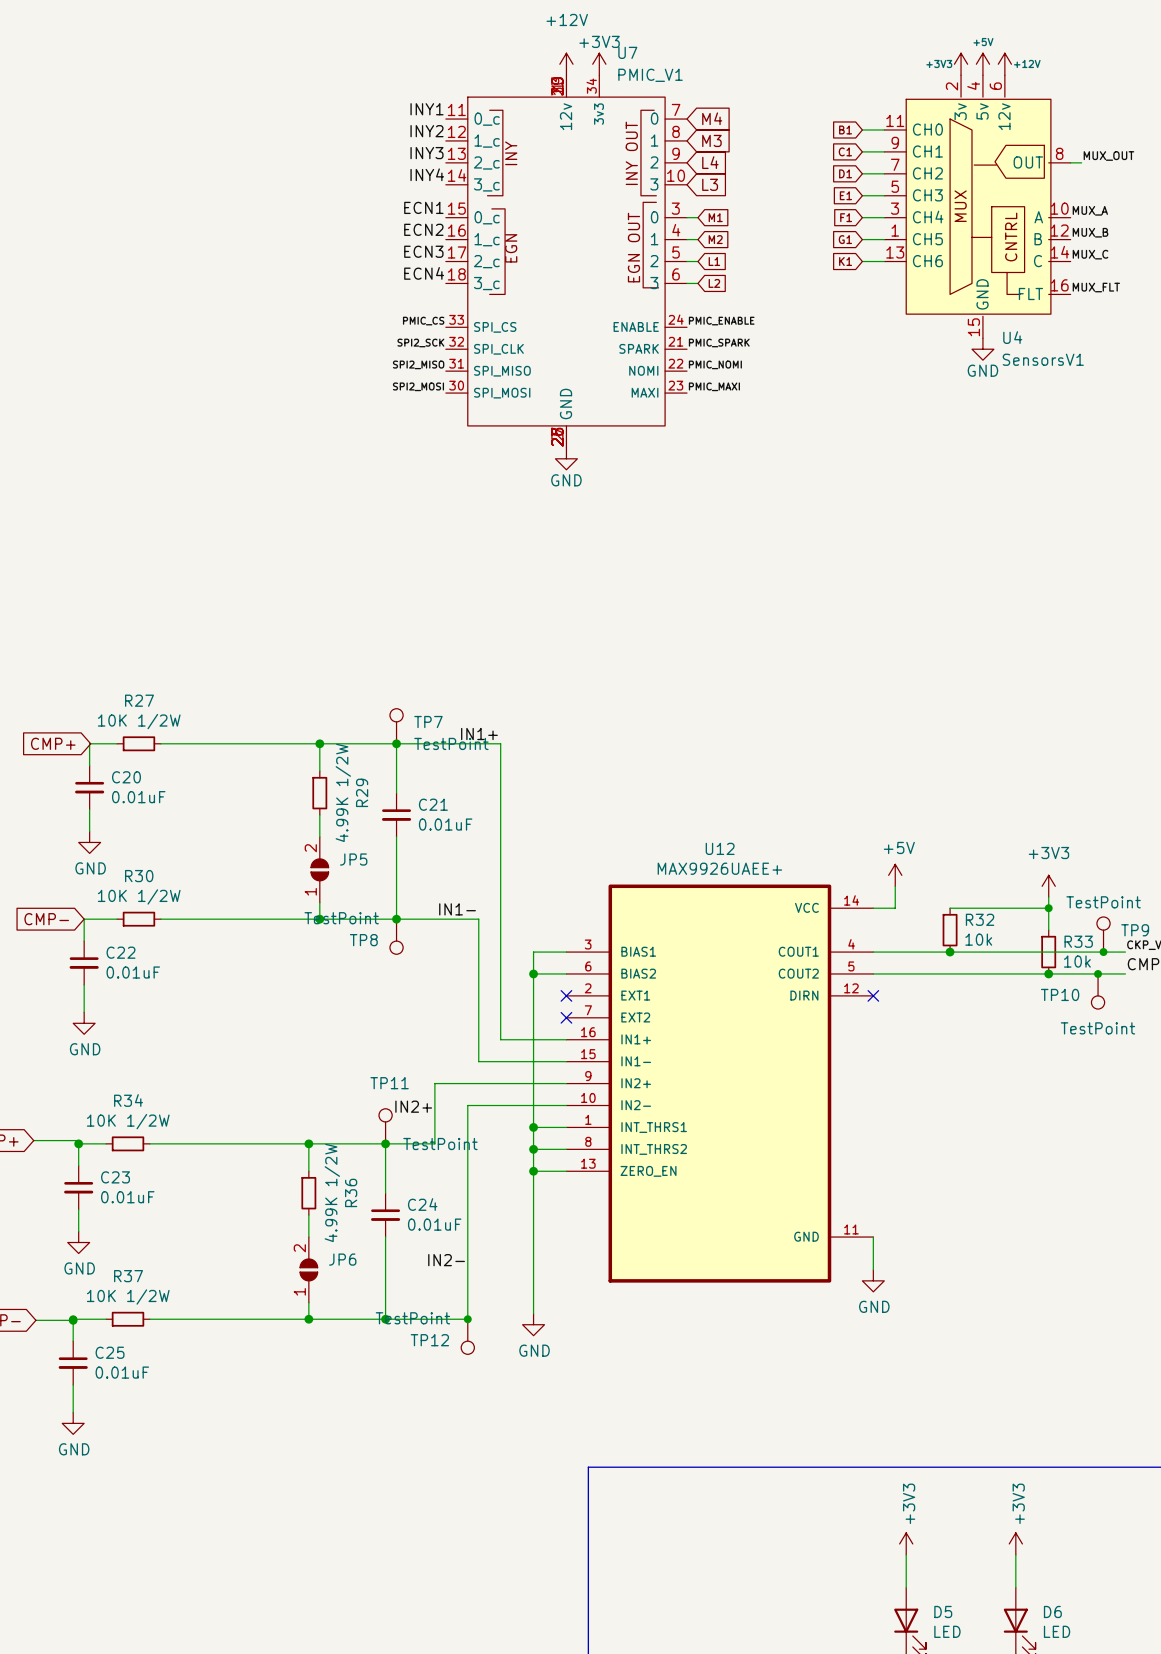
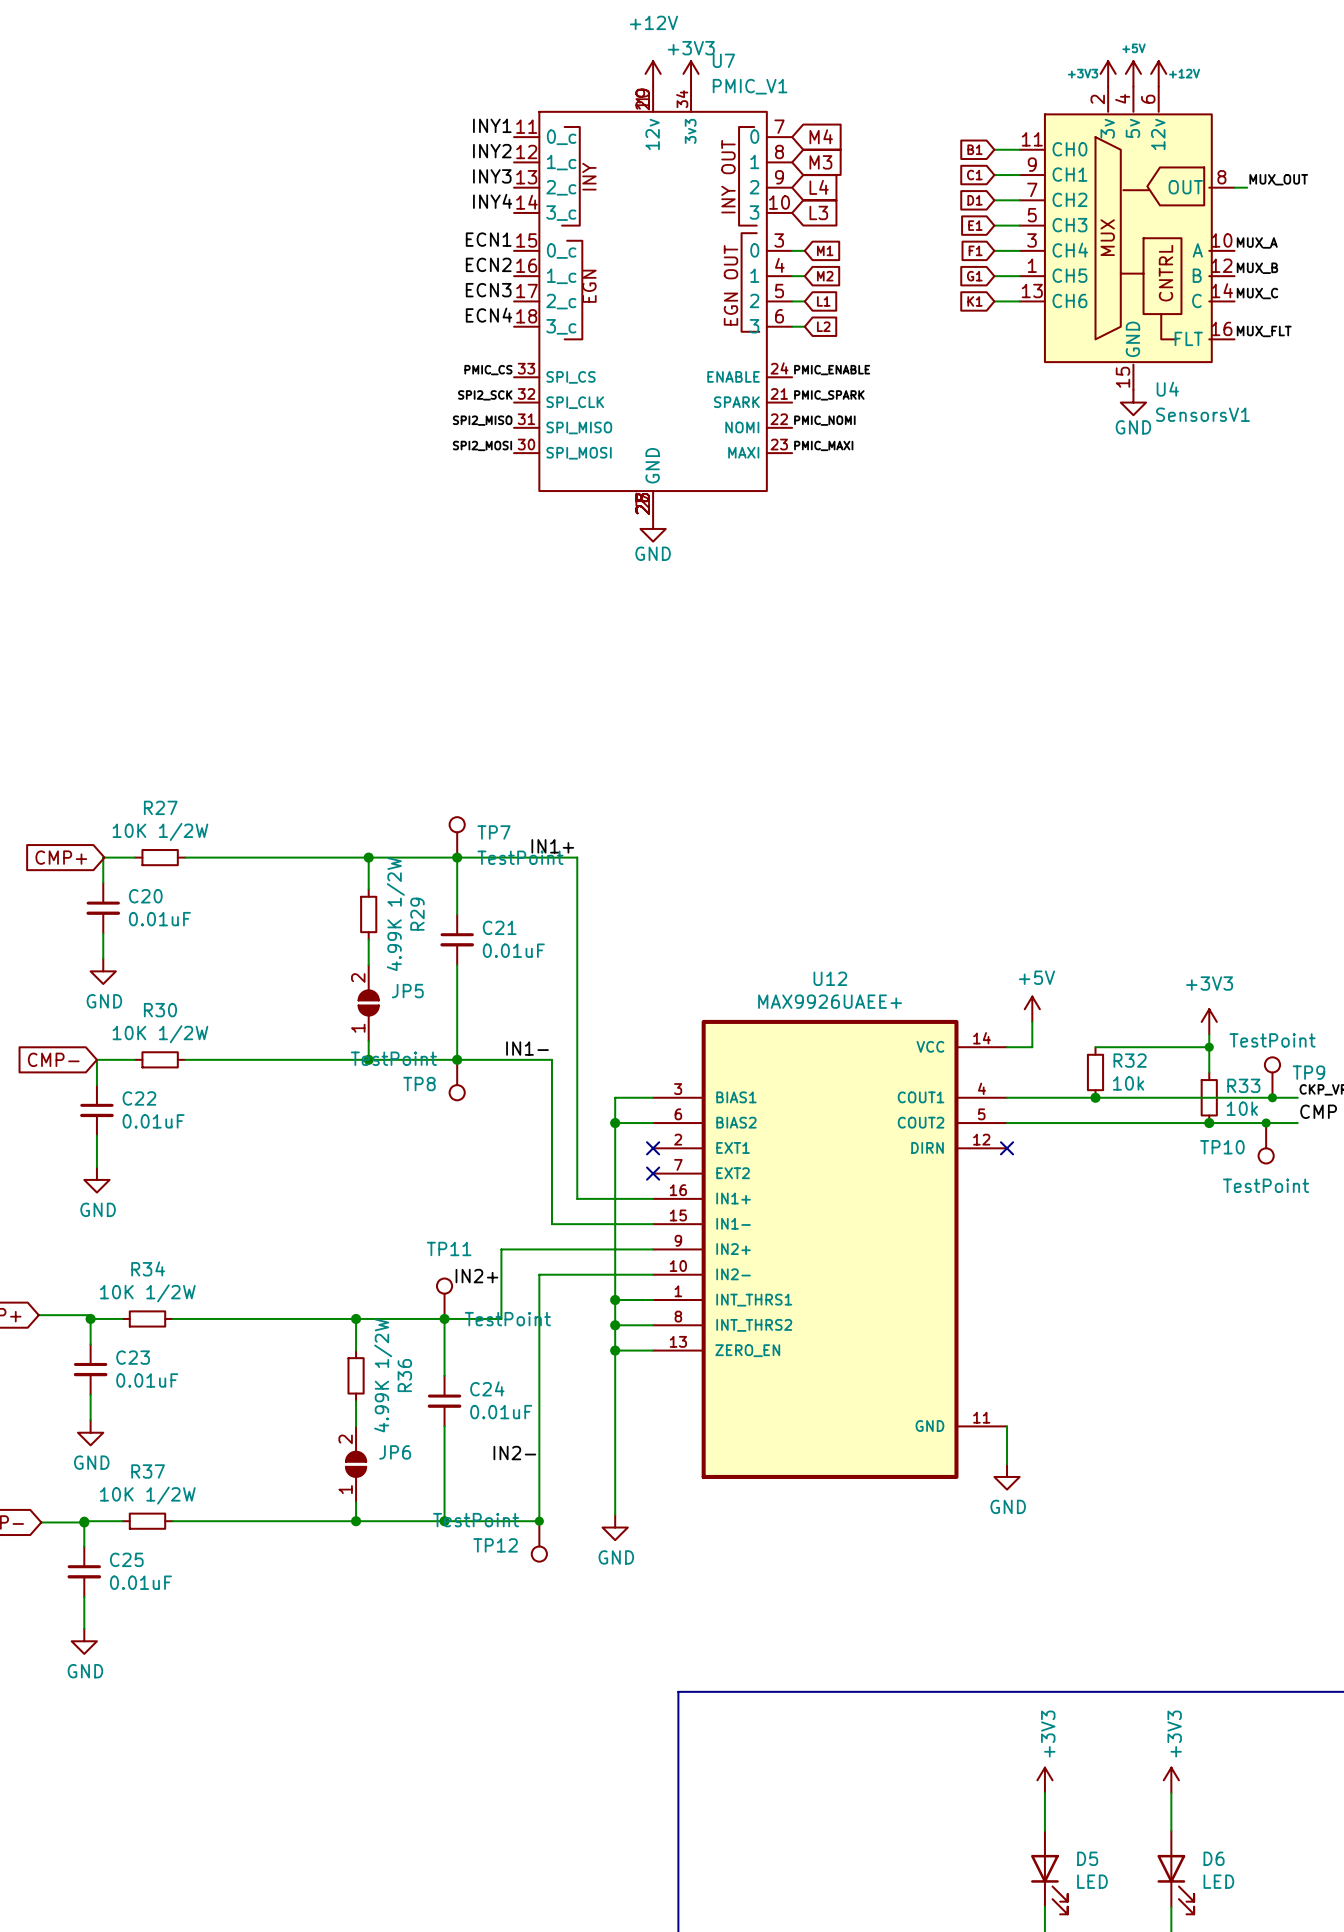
U7 symbol: [445, 75, 688, 448] -> [514, 86, 793, 517]

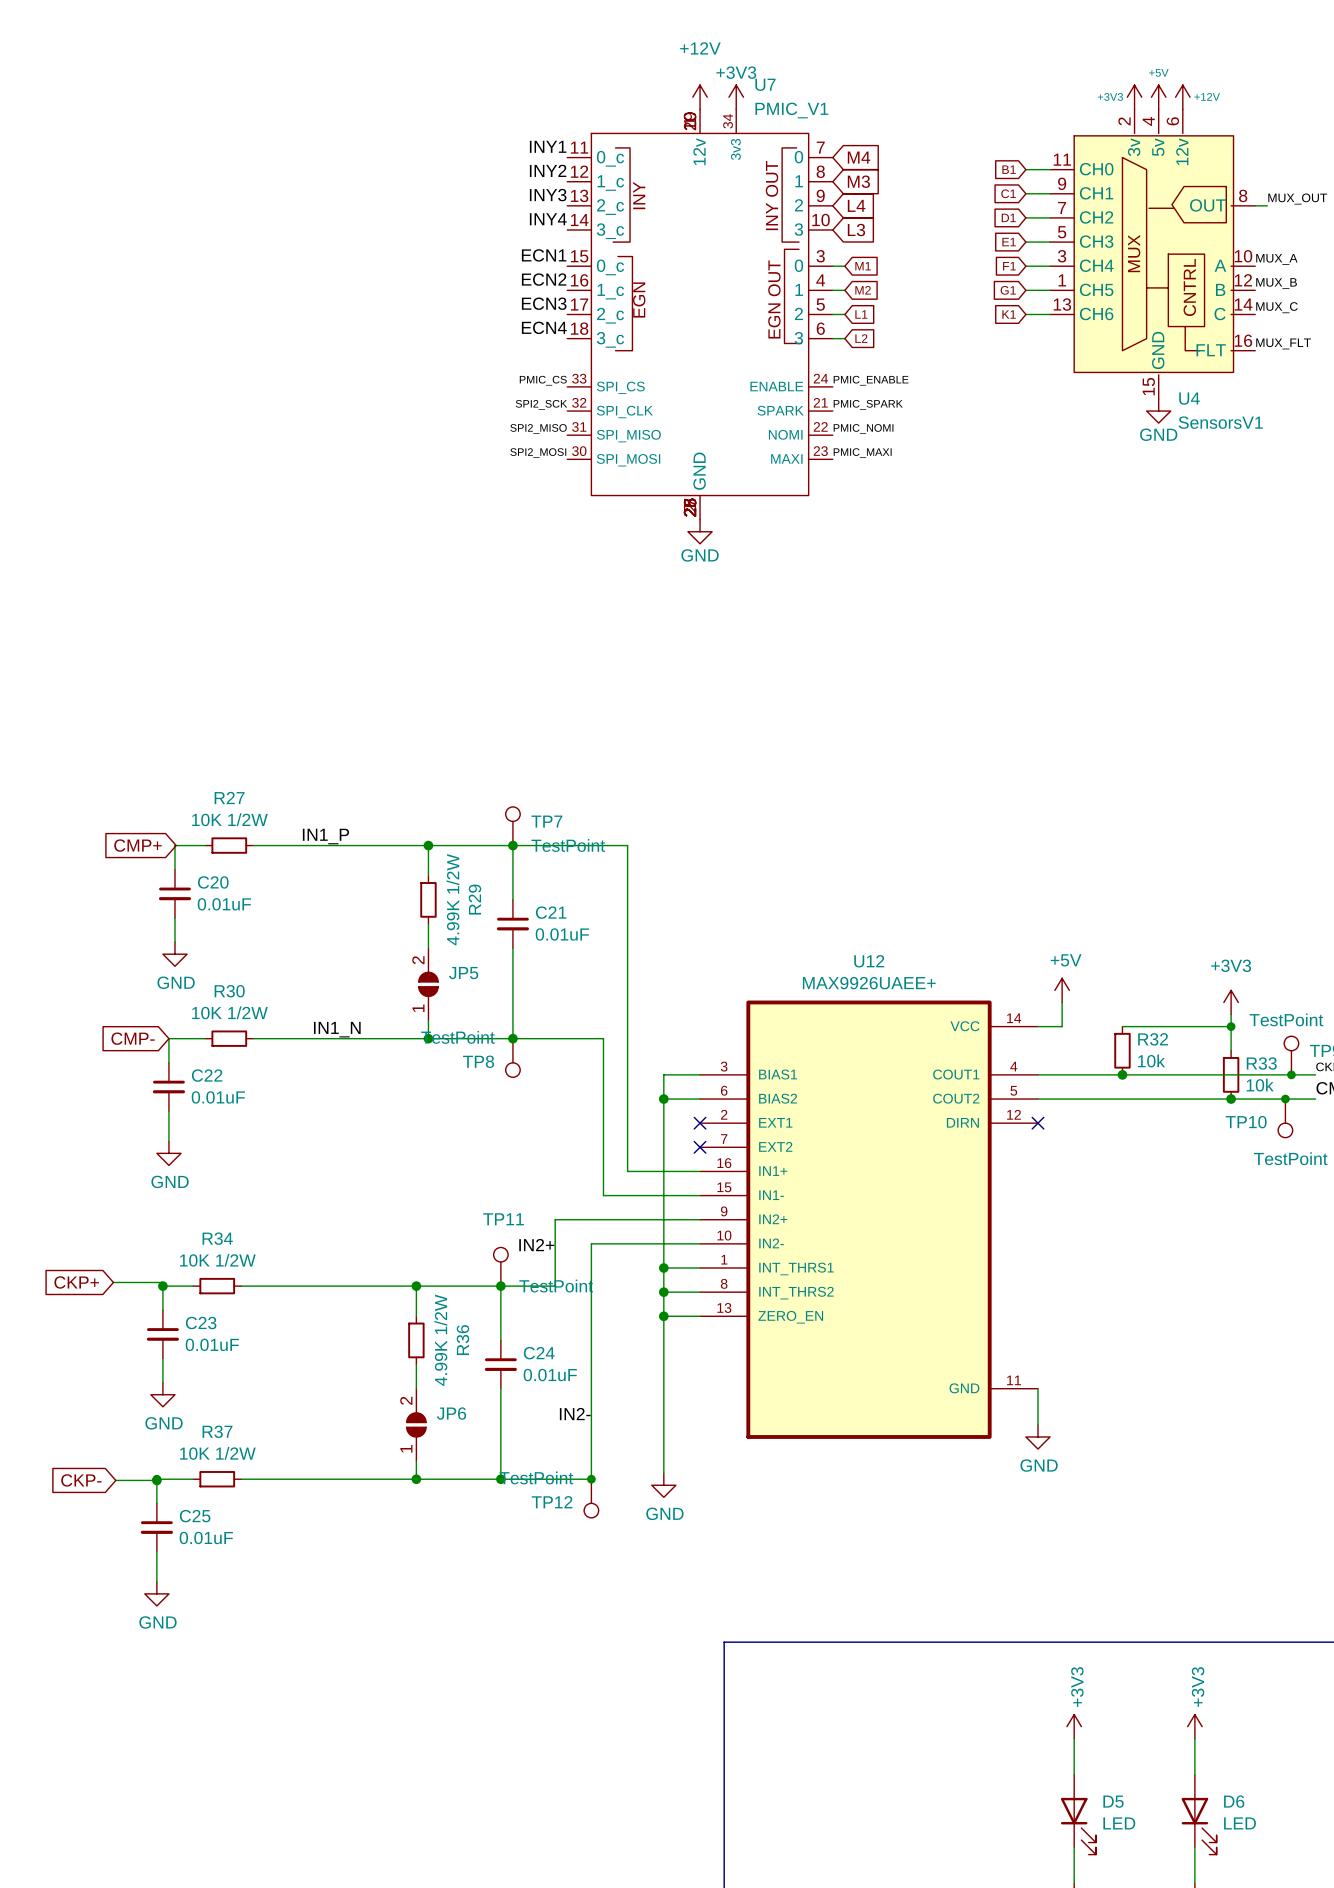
label: none -> IN1_P (325, 836)
label: IN1+ (552, 846) -> none
label: IN1- (527, 1048) -> none
label: none -> IN1_N (337, 1029)

